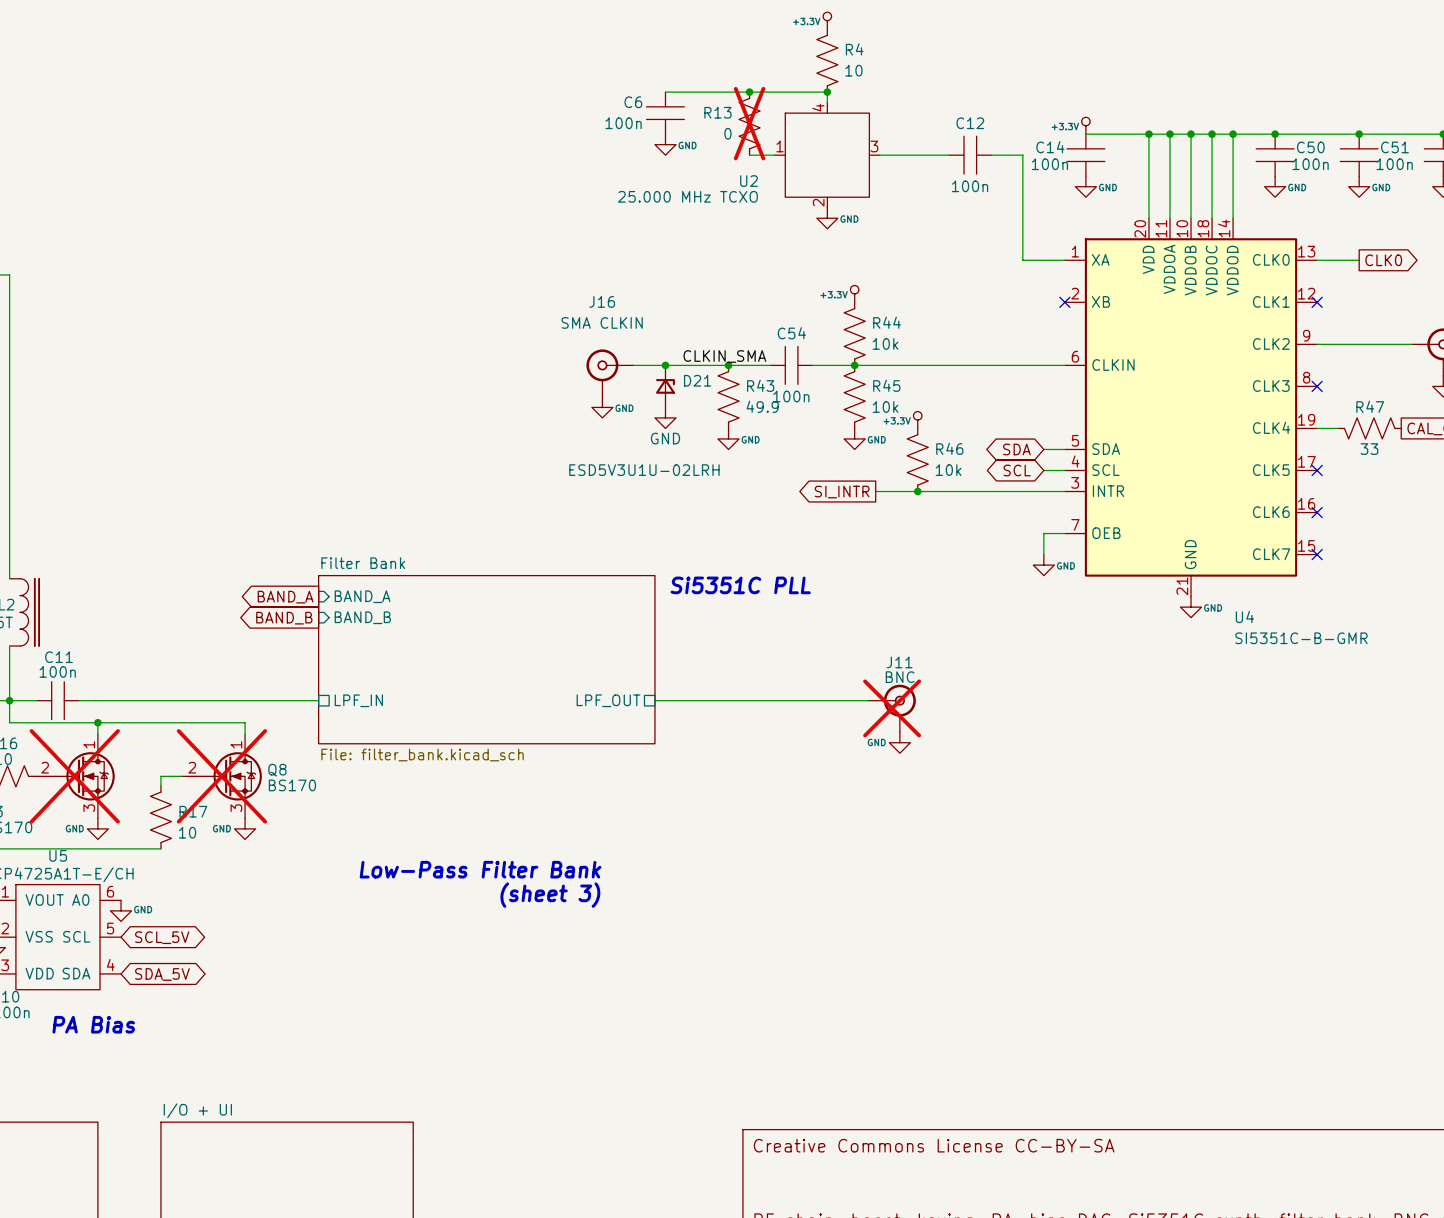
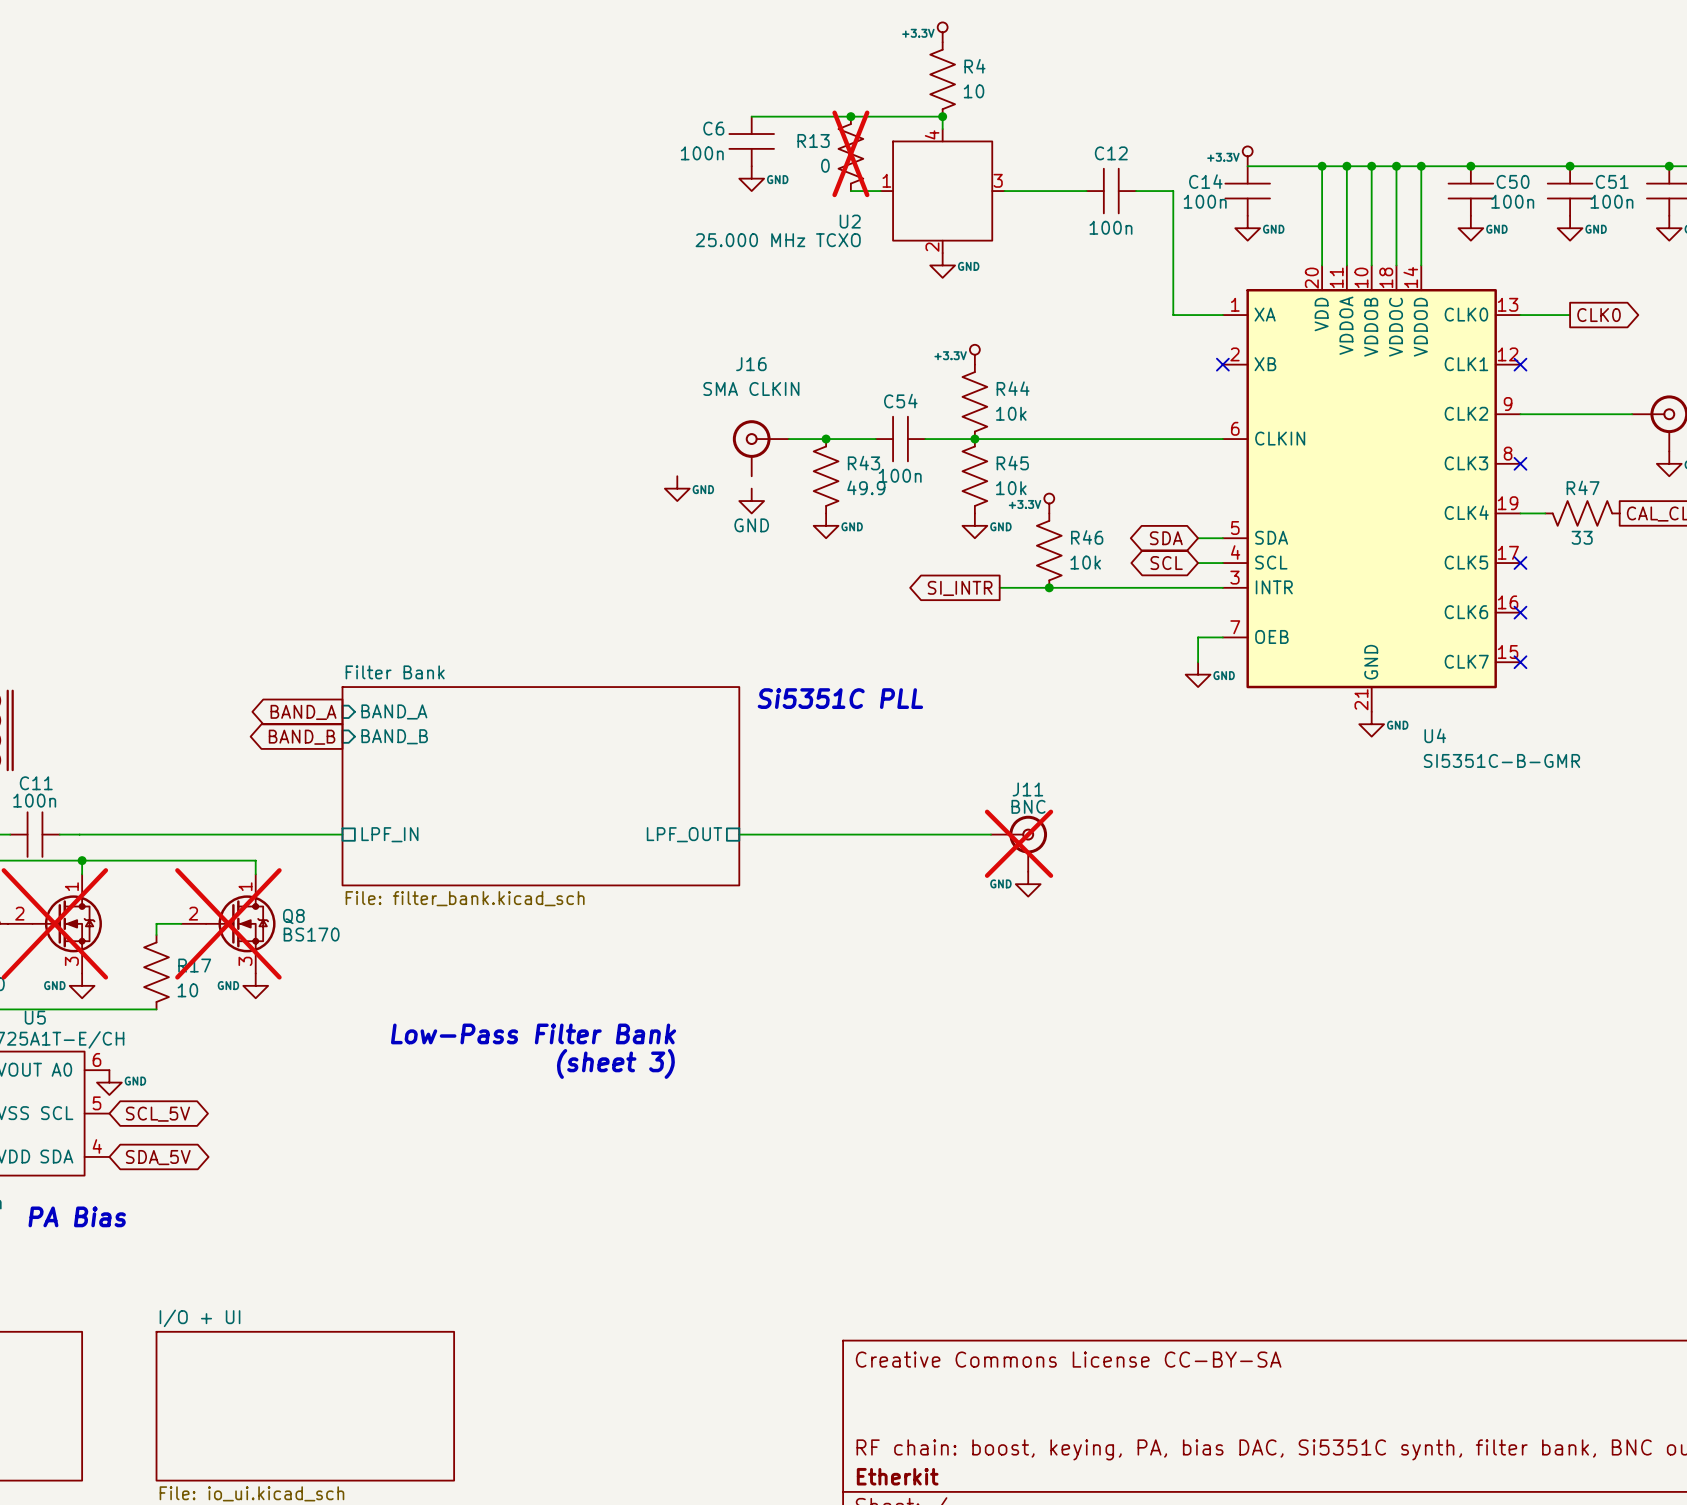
label: CLKIN_SMA (724, 356) -> none
wire: (633, 365) (697, 365) -> none
junction: (665, 365) -> none
J16 position: (610, 373) -> (760, 448)
D21: ESD5V3U1U-02LRH (665, 386) -> none

